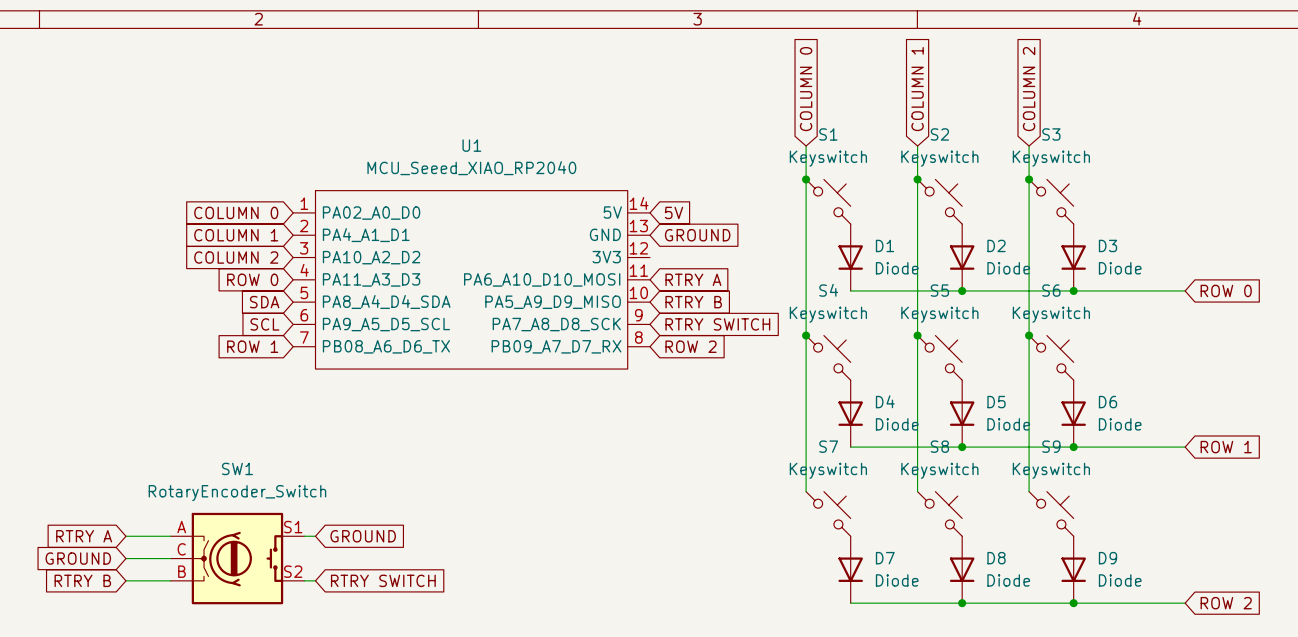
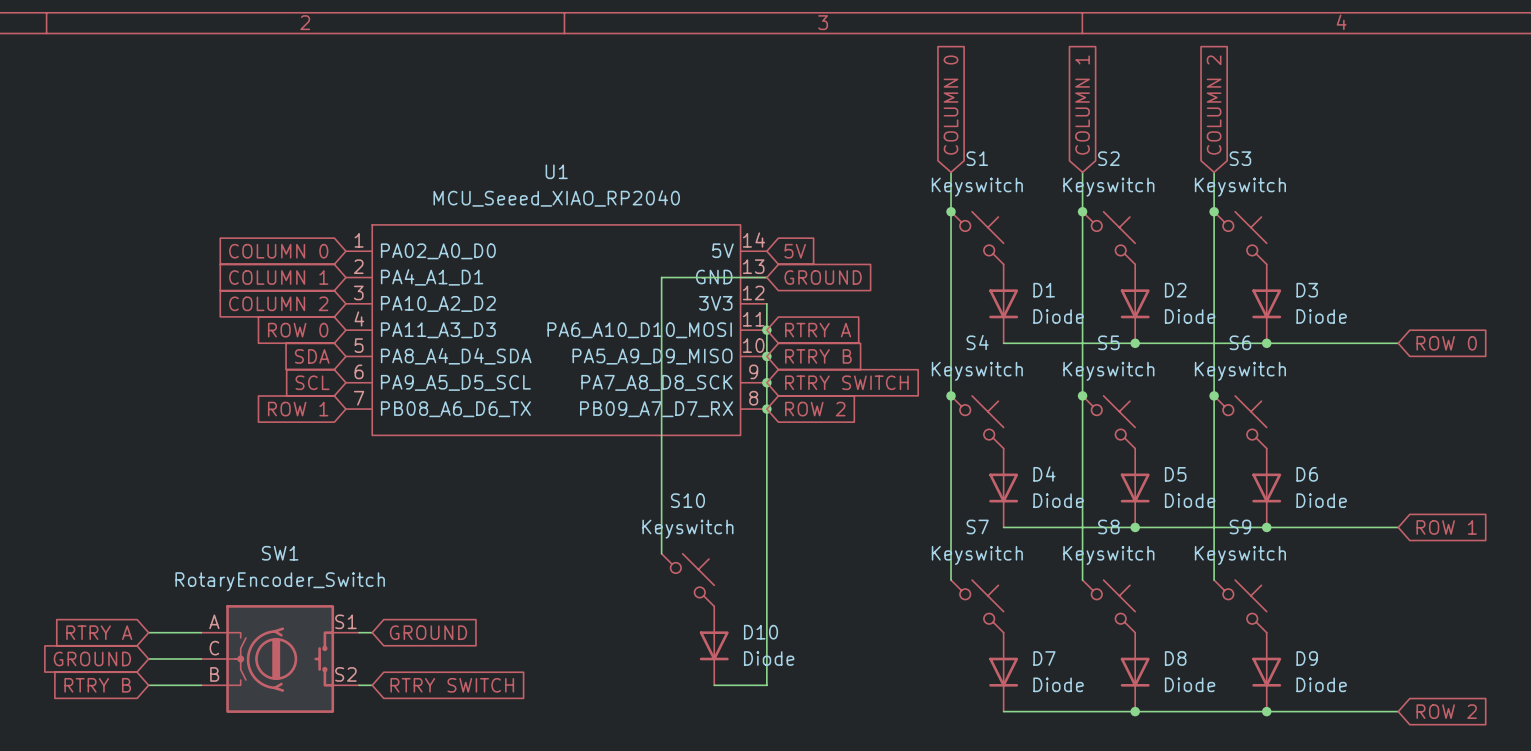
wire: none -> (766, 277) (661, 277) (661, 553)
wire: none -> (766, 303) (766, 685) (714, 685)
junction: none -> (766, 330)
junction: none -> (766, 356)
junction: none -> (766, 382)
junction: none -> (766, 409)
S10: none -> Keyswitch (687, 580)
D10: none -> Diode (714, 645)

